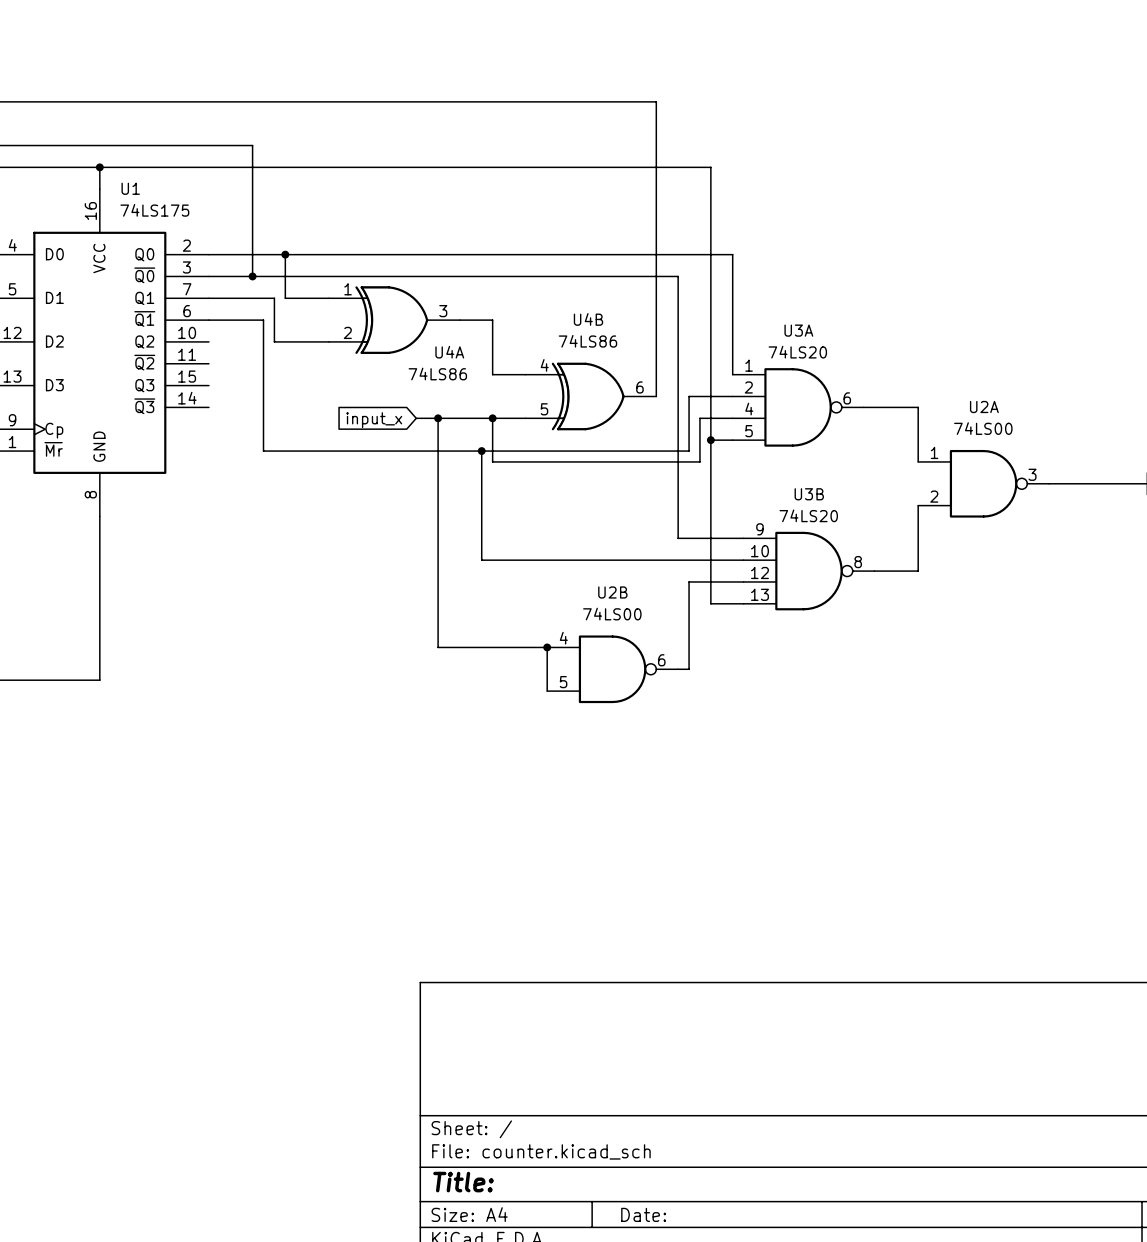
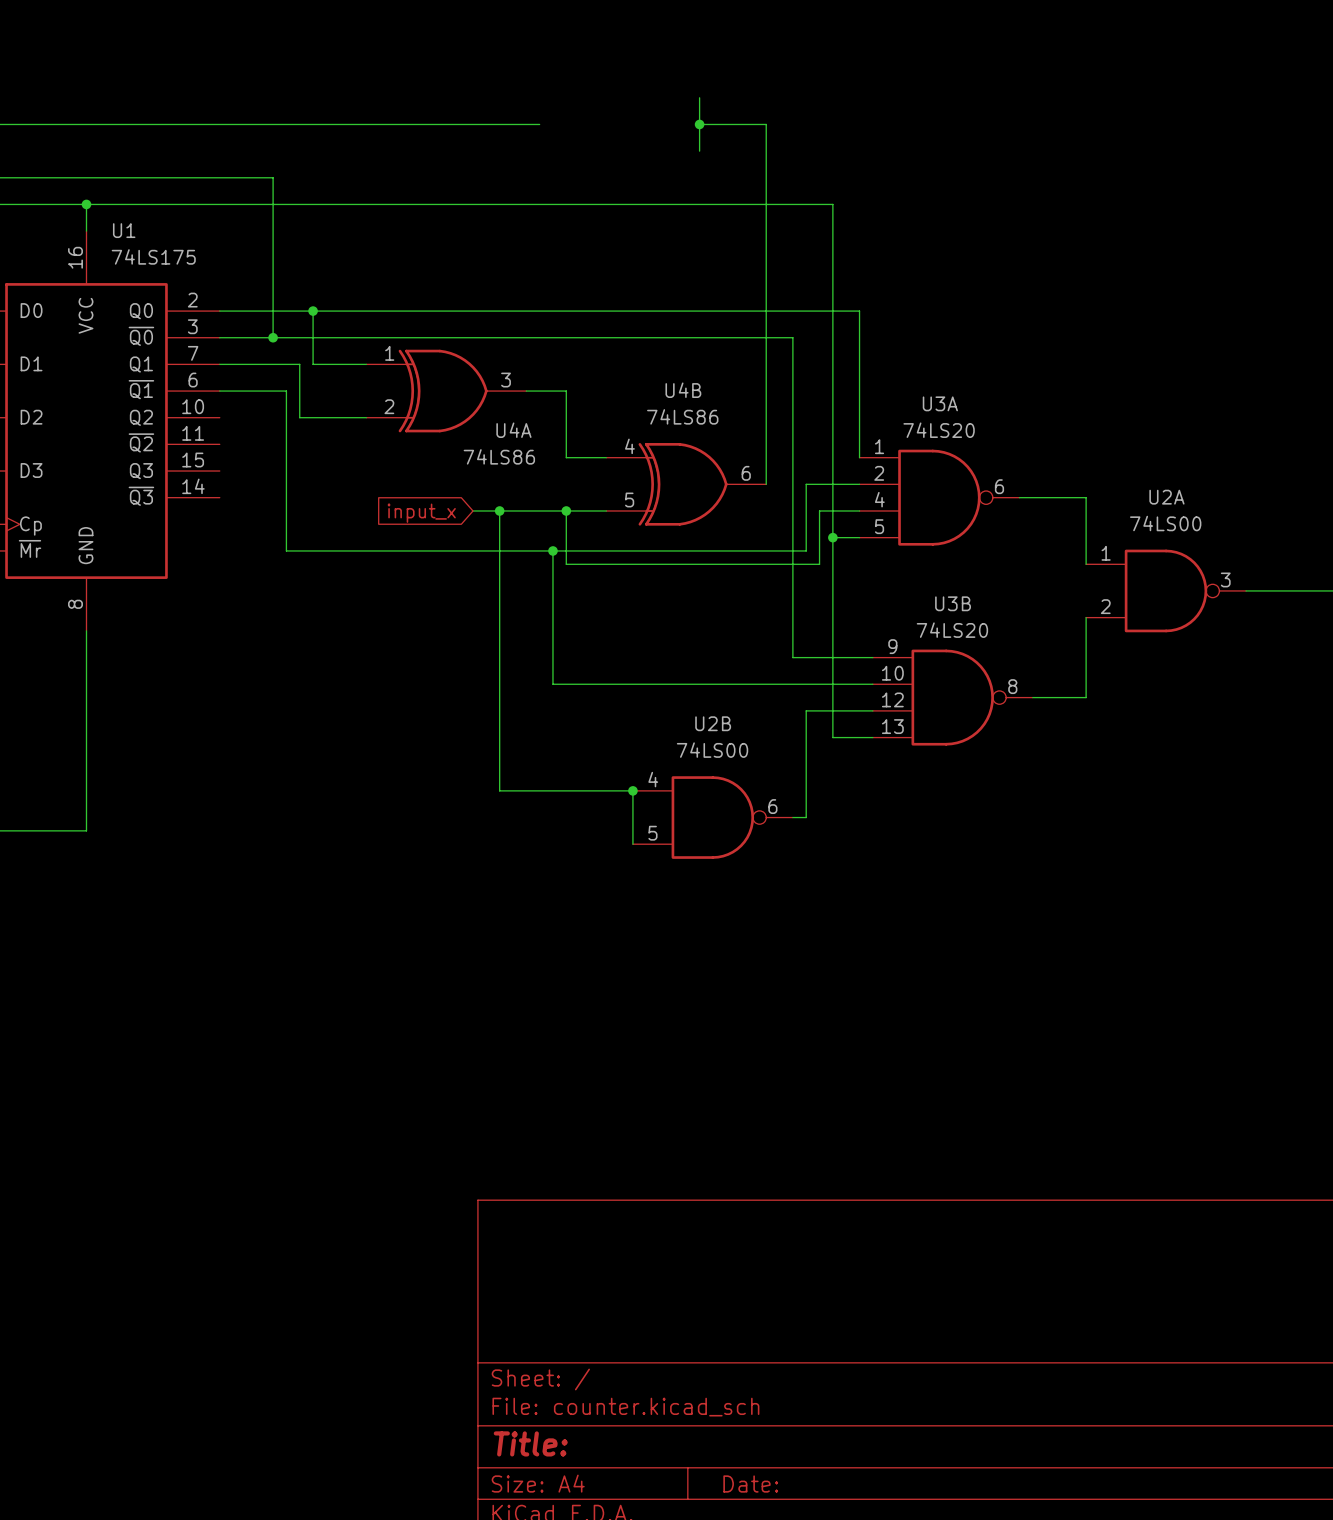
wire: none -> (699, 97) (699, 151)
wire: (470, 101) (601, 101) -> none
junction: none -> (699, 124)

